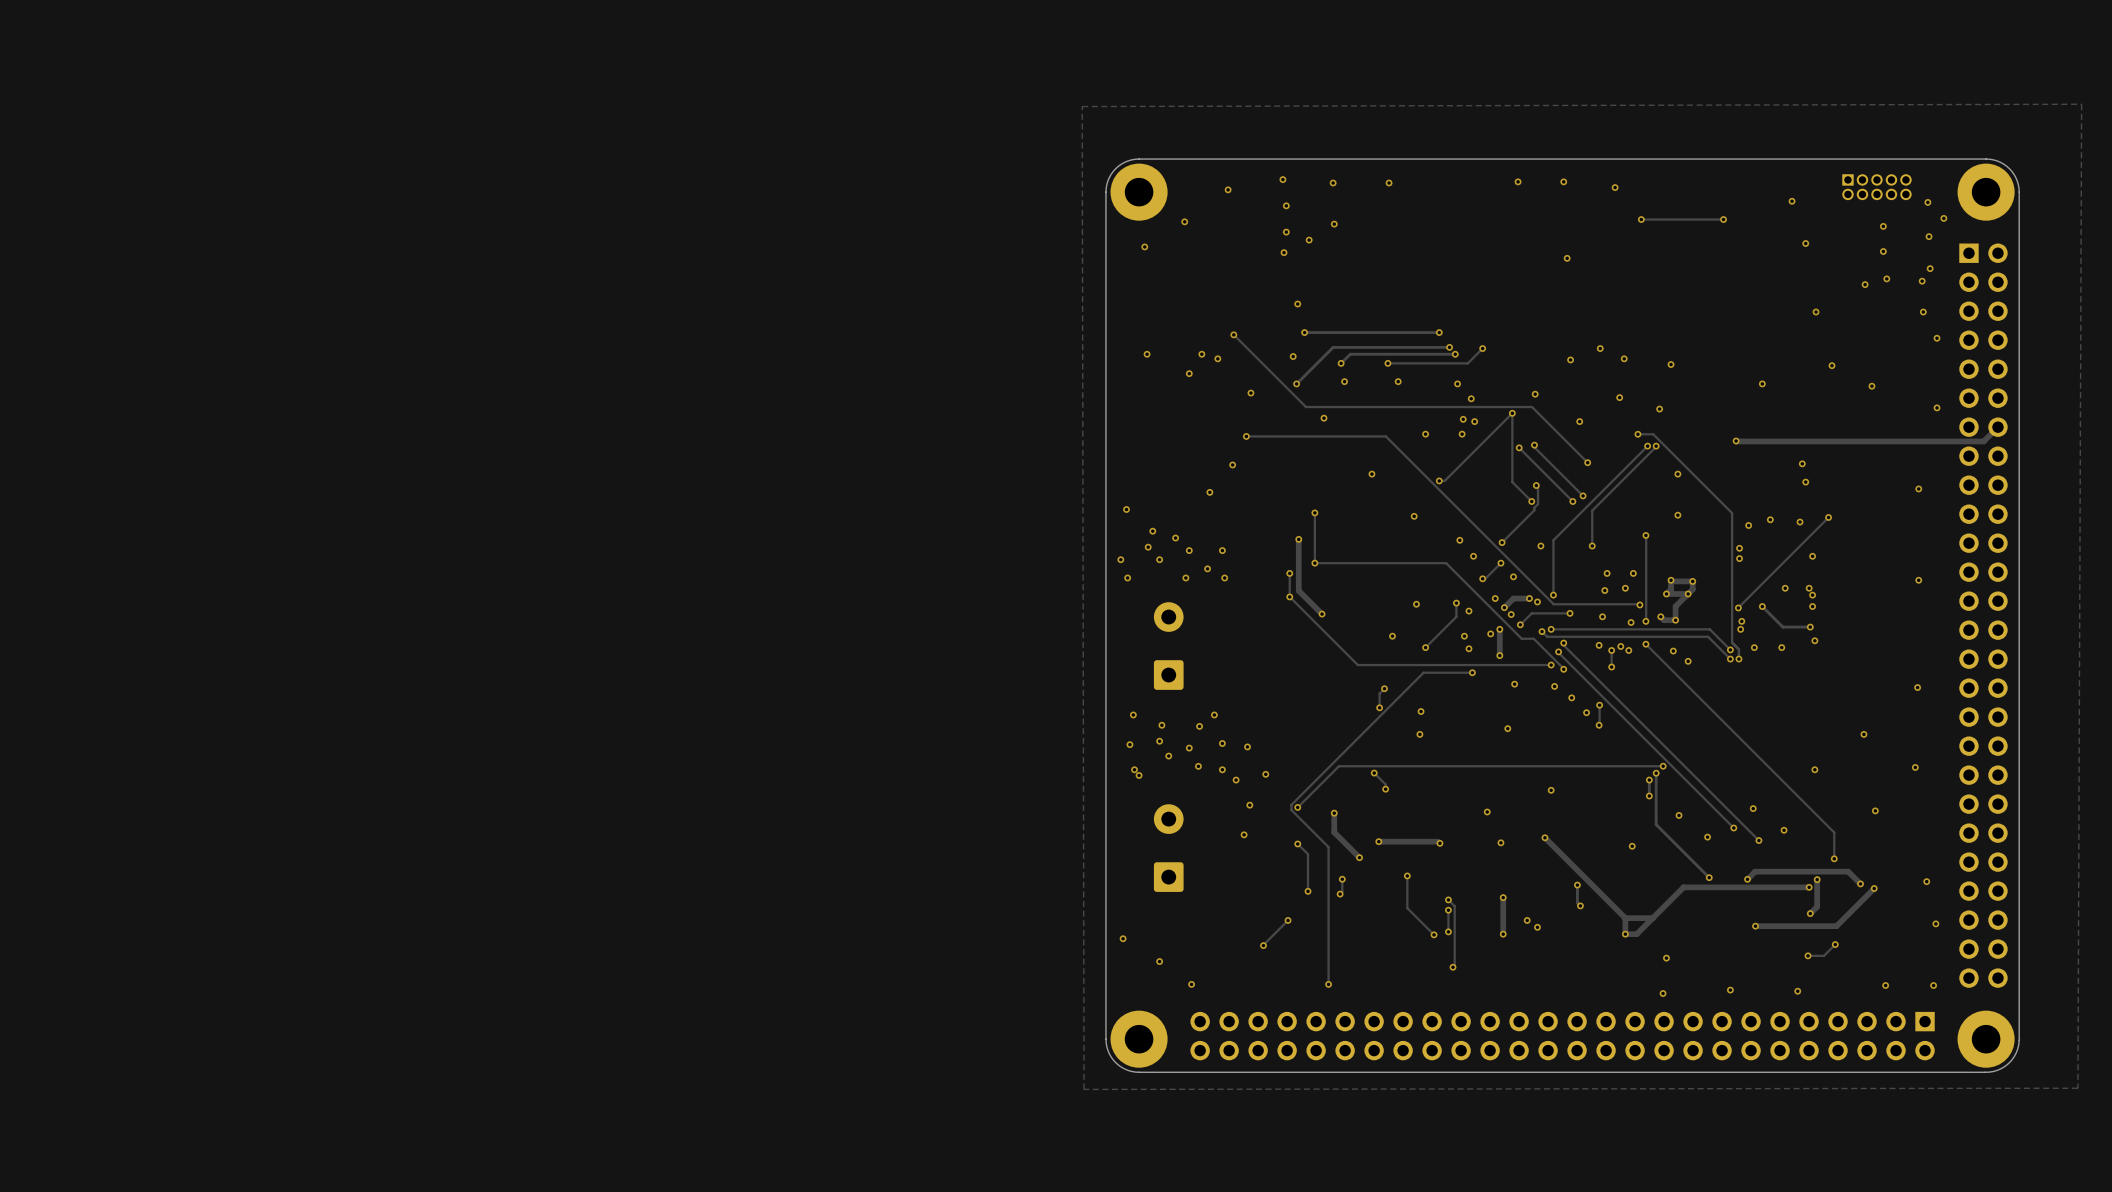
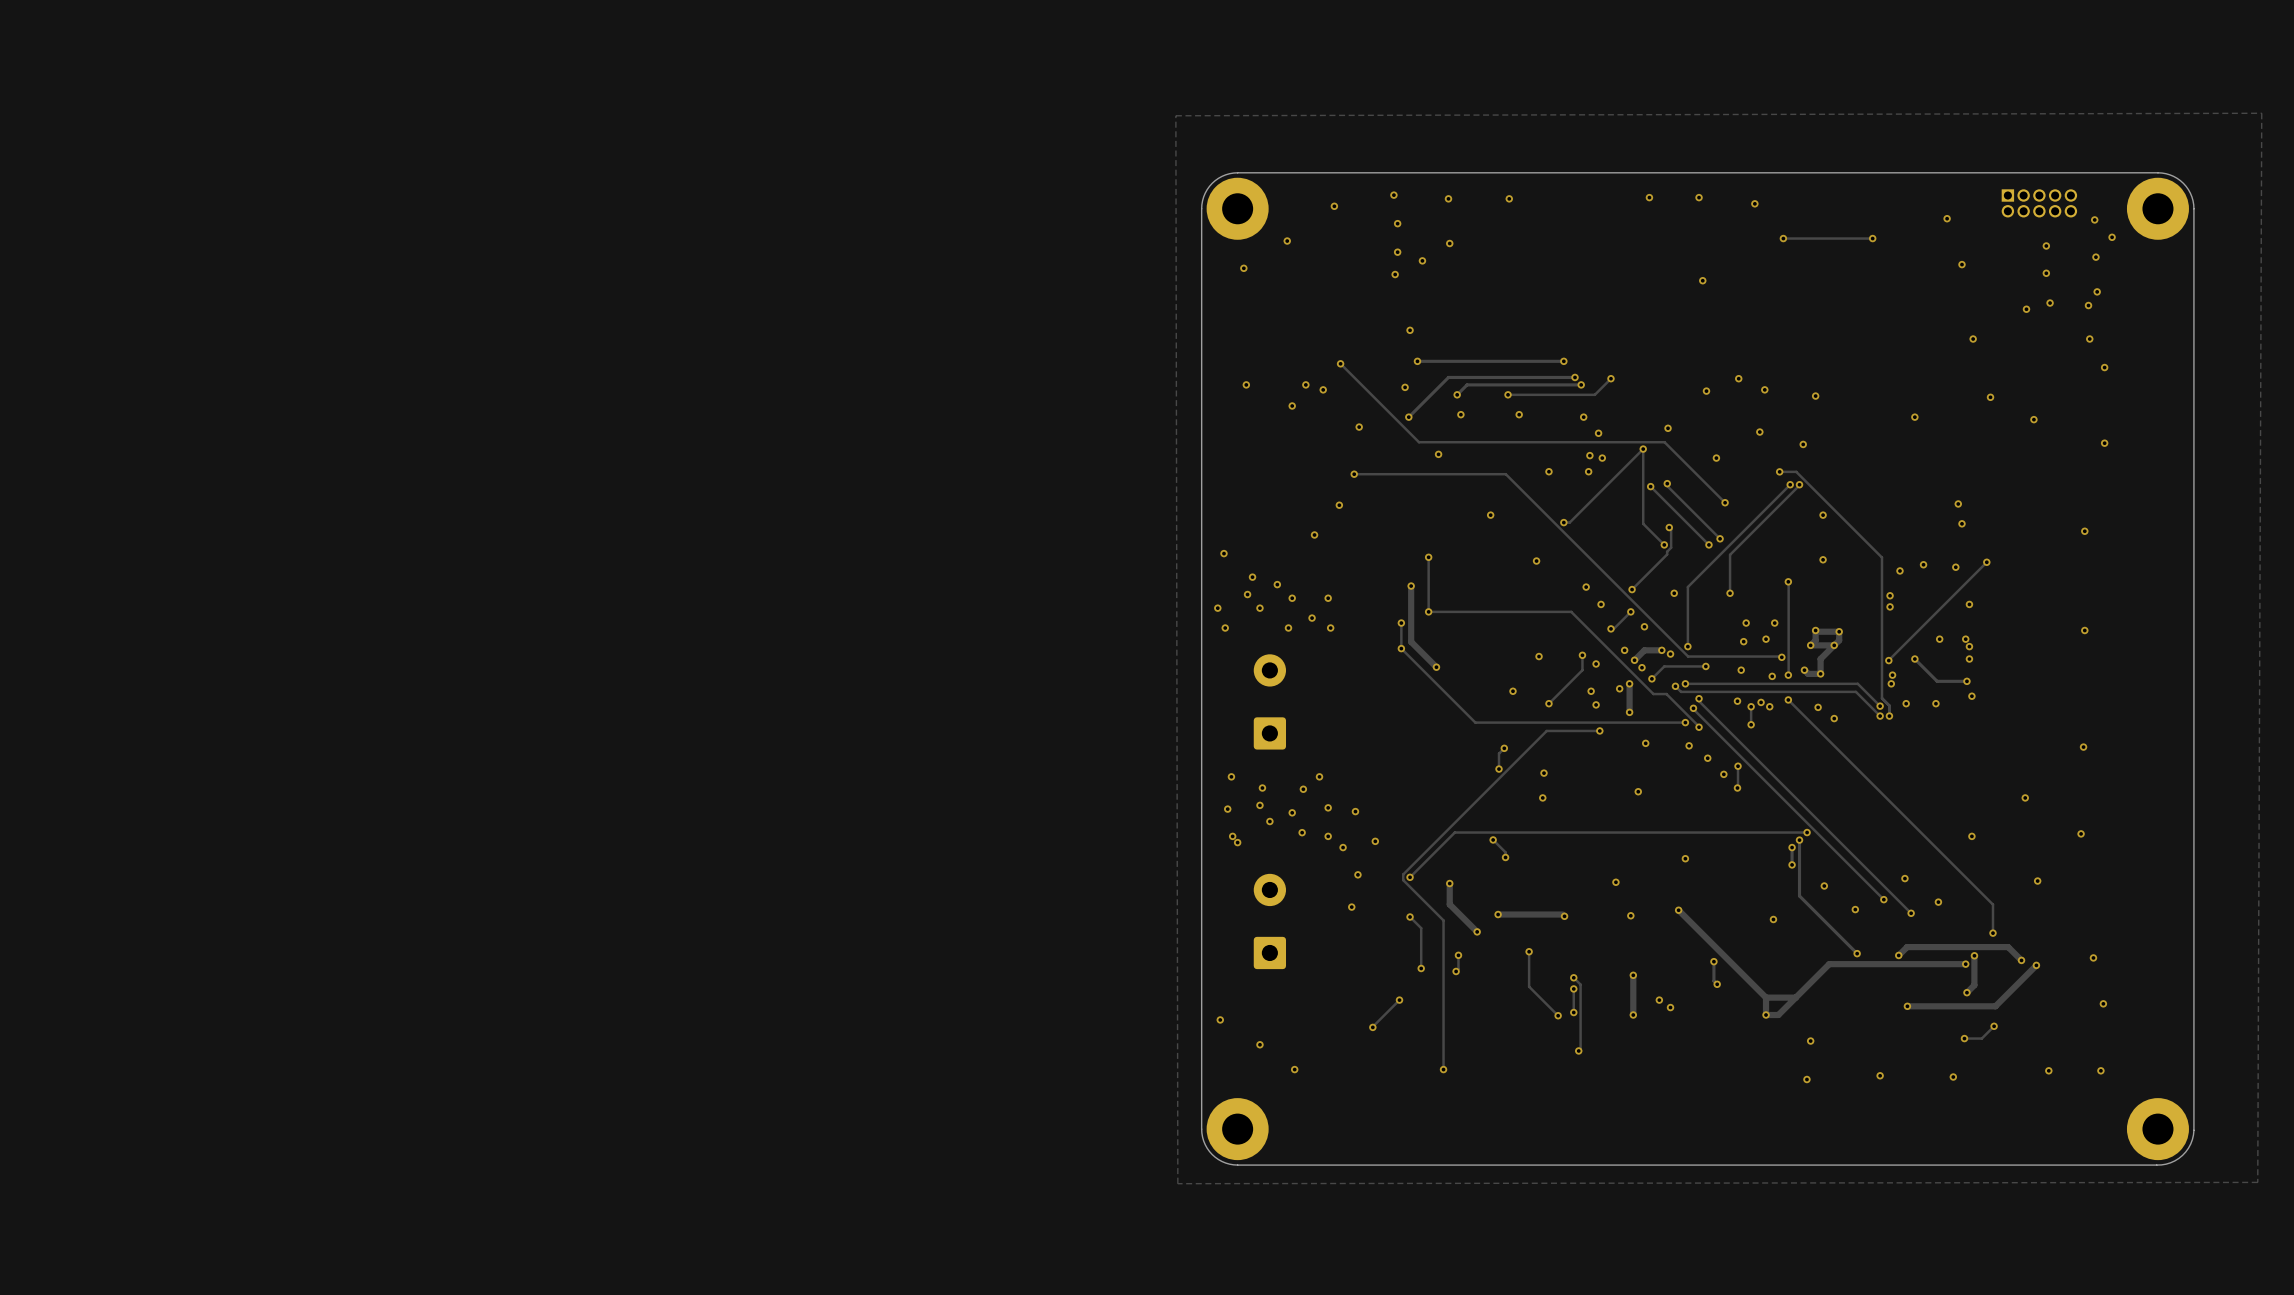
track: (1997, 427) (1983, 441) (1736, 441) -> none
via: (1736, 441) -> none
part: (1983, 615) -> none
part: (1562, 1036) -> none

